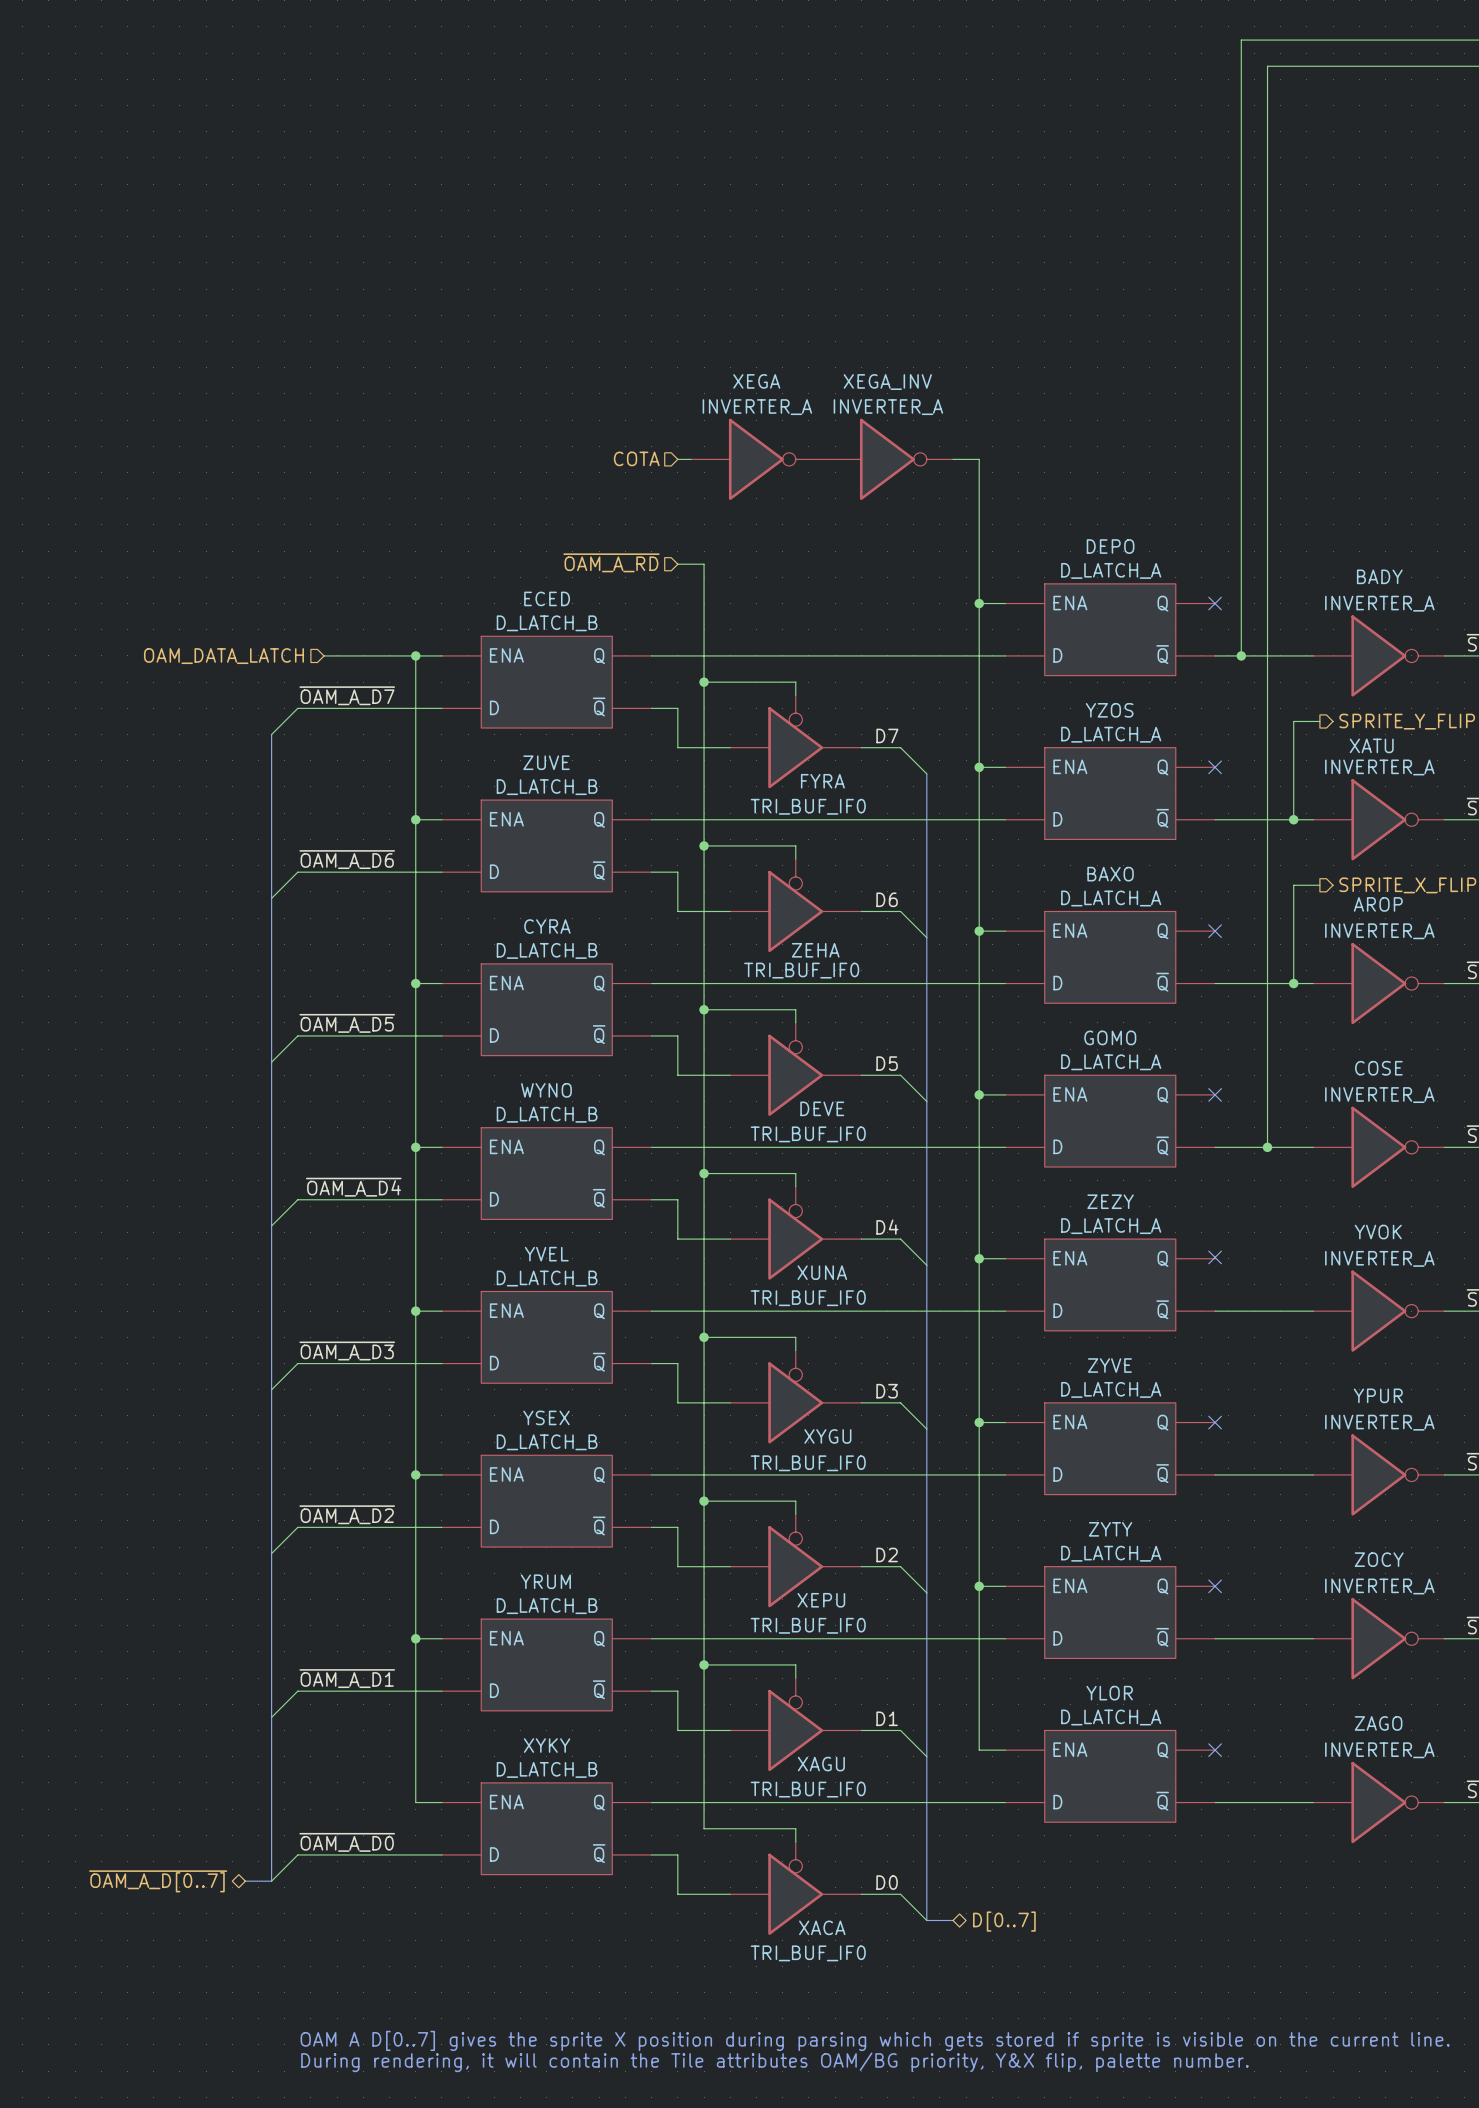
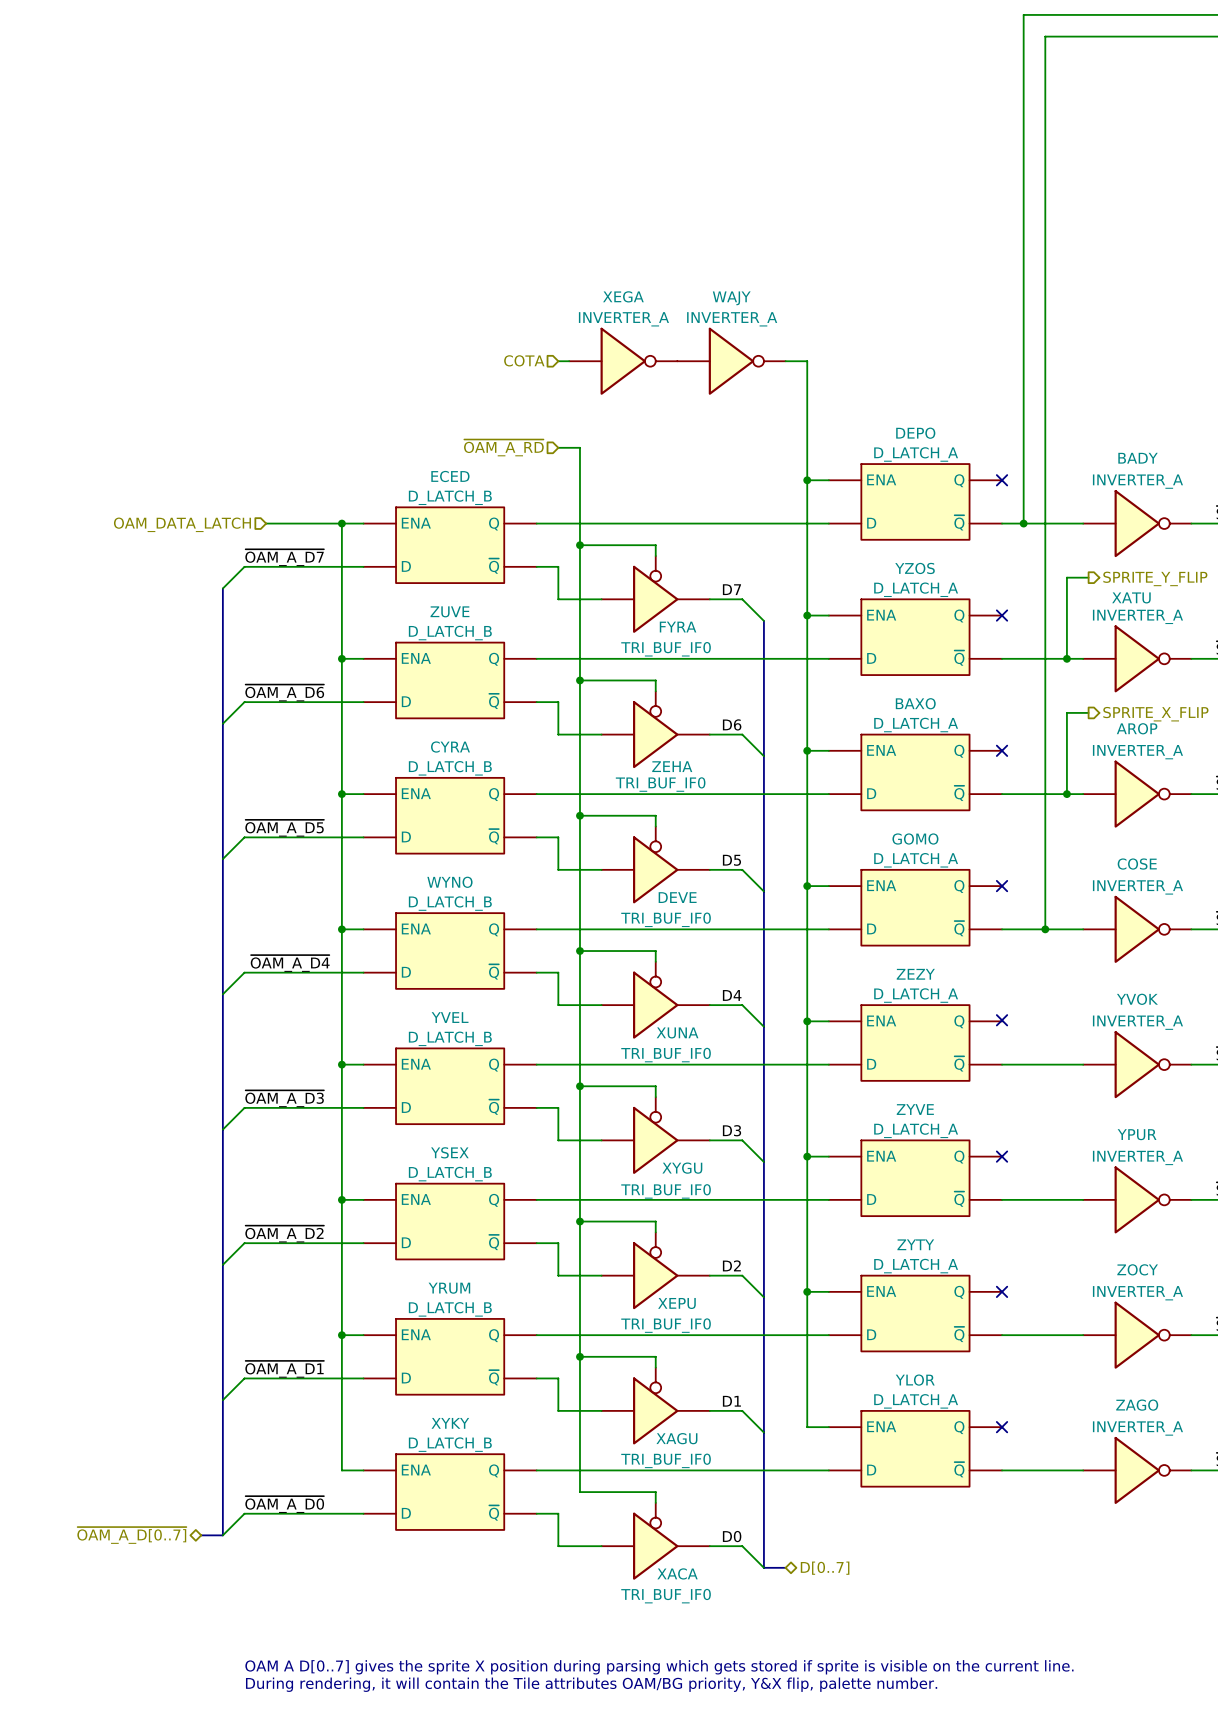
XEGA_INV name: XEGA_INV (887, 382) -> WAJY (731, 298)

